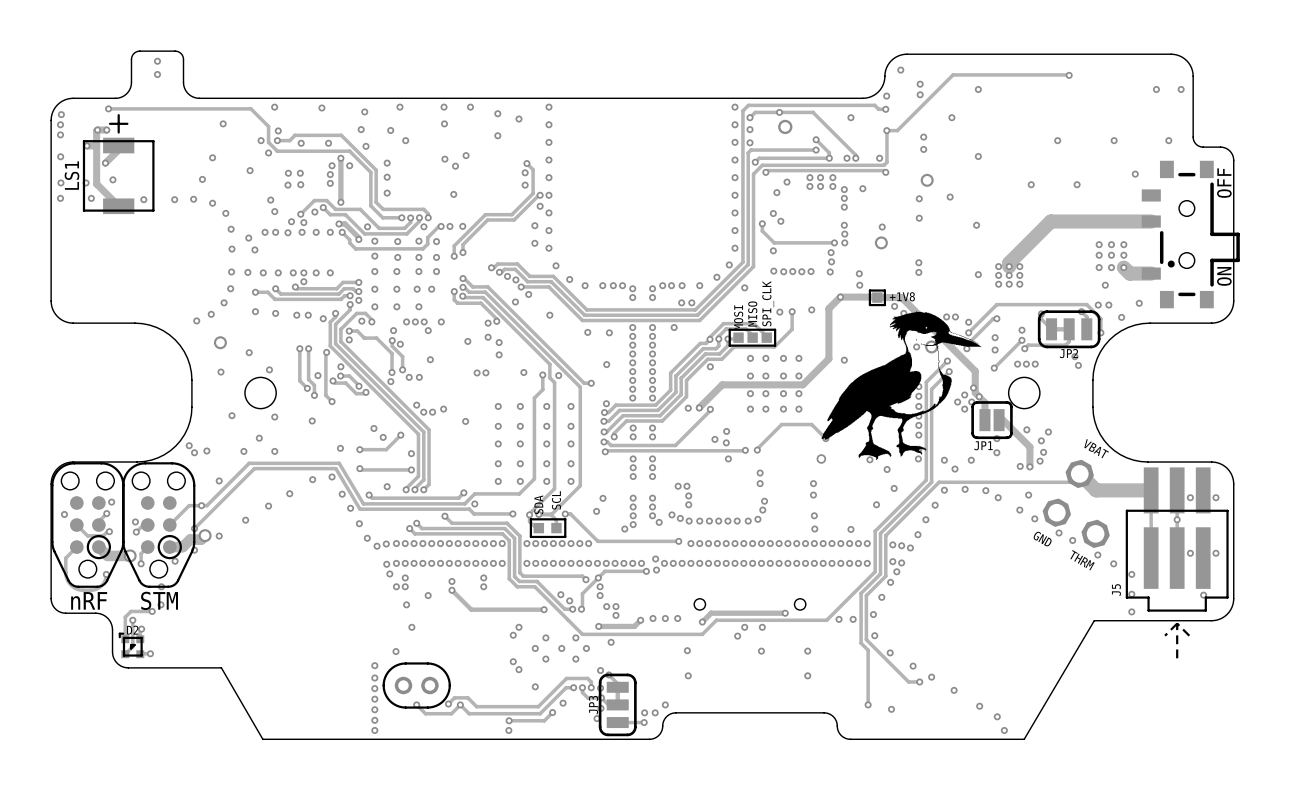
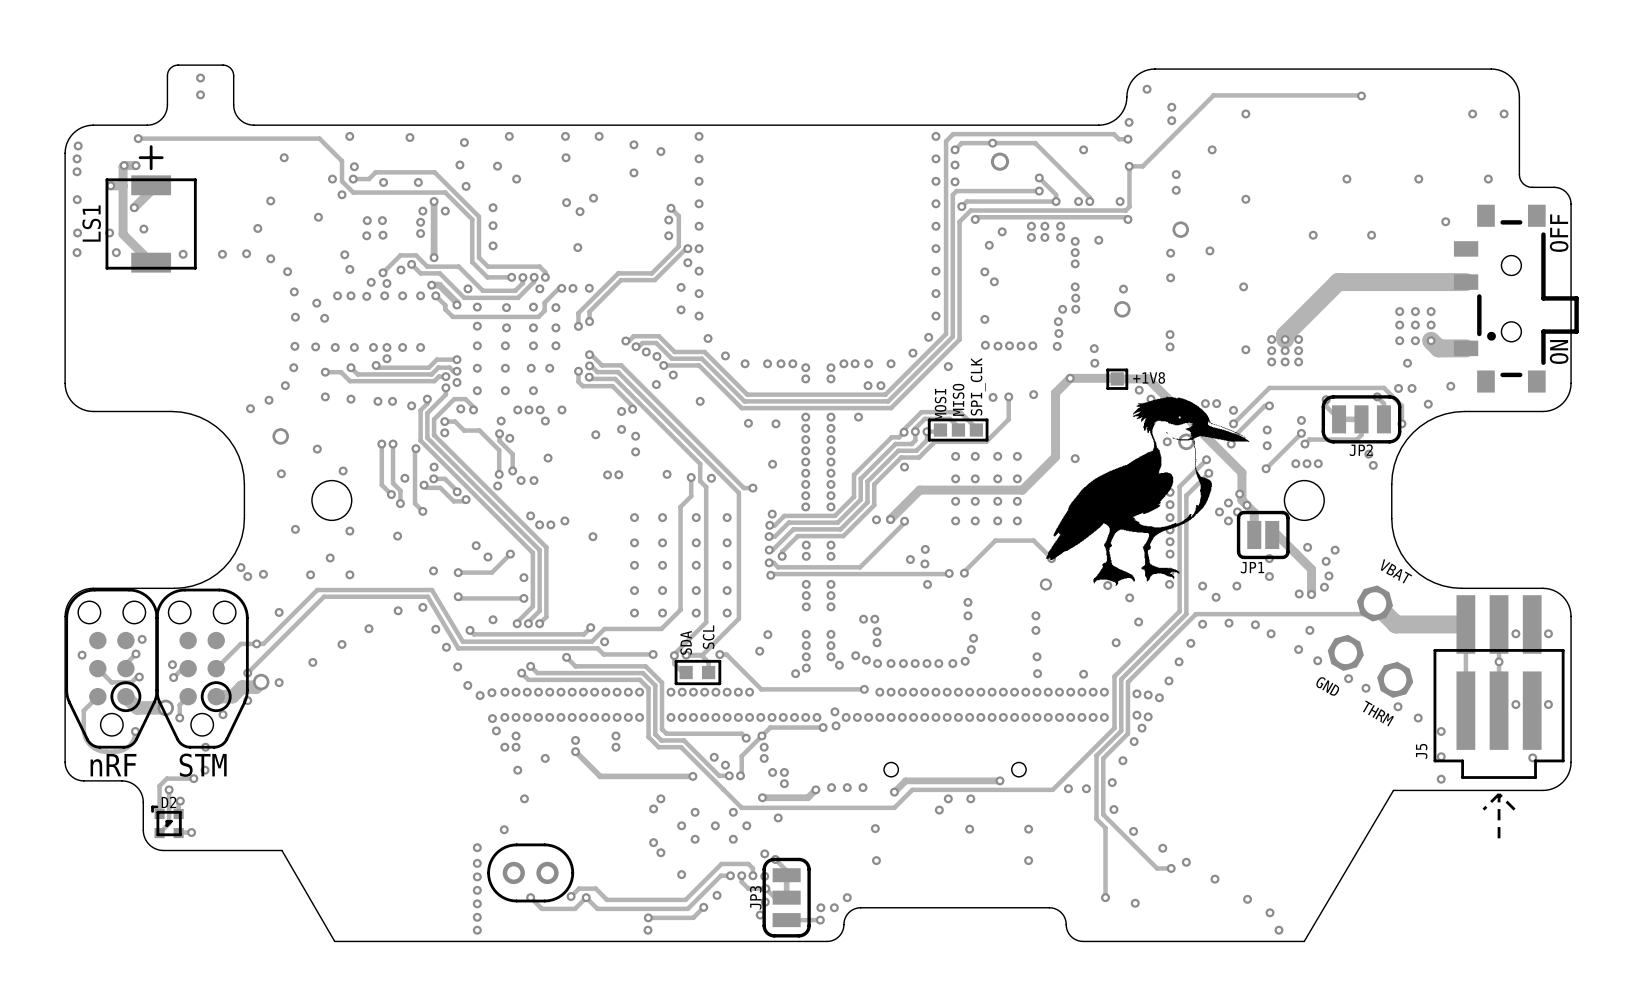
track: (762, 223) (762, 230) (774, 242) (834, 242) -> none
via: (762, 223) -> none

